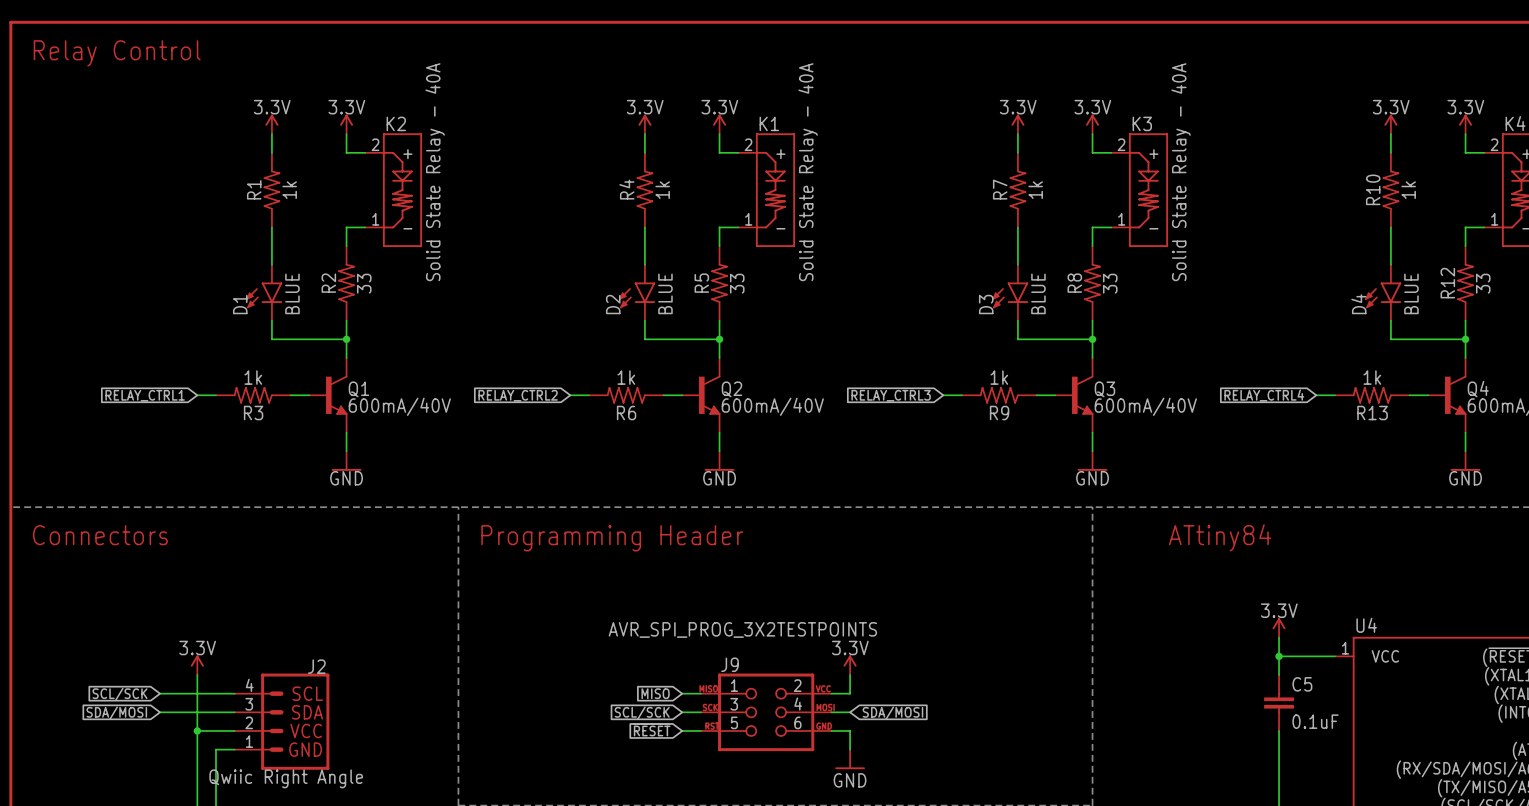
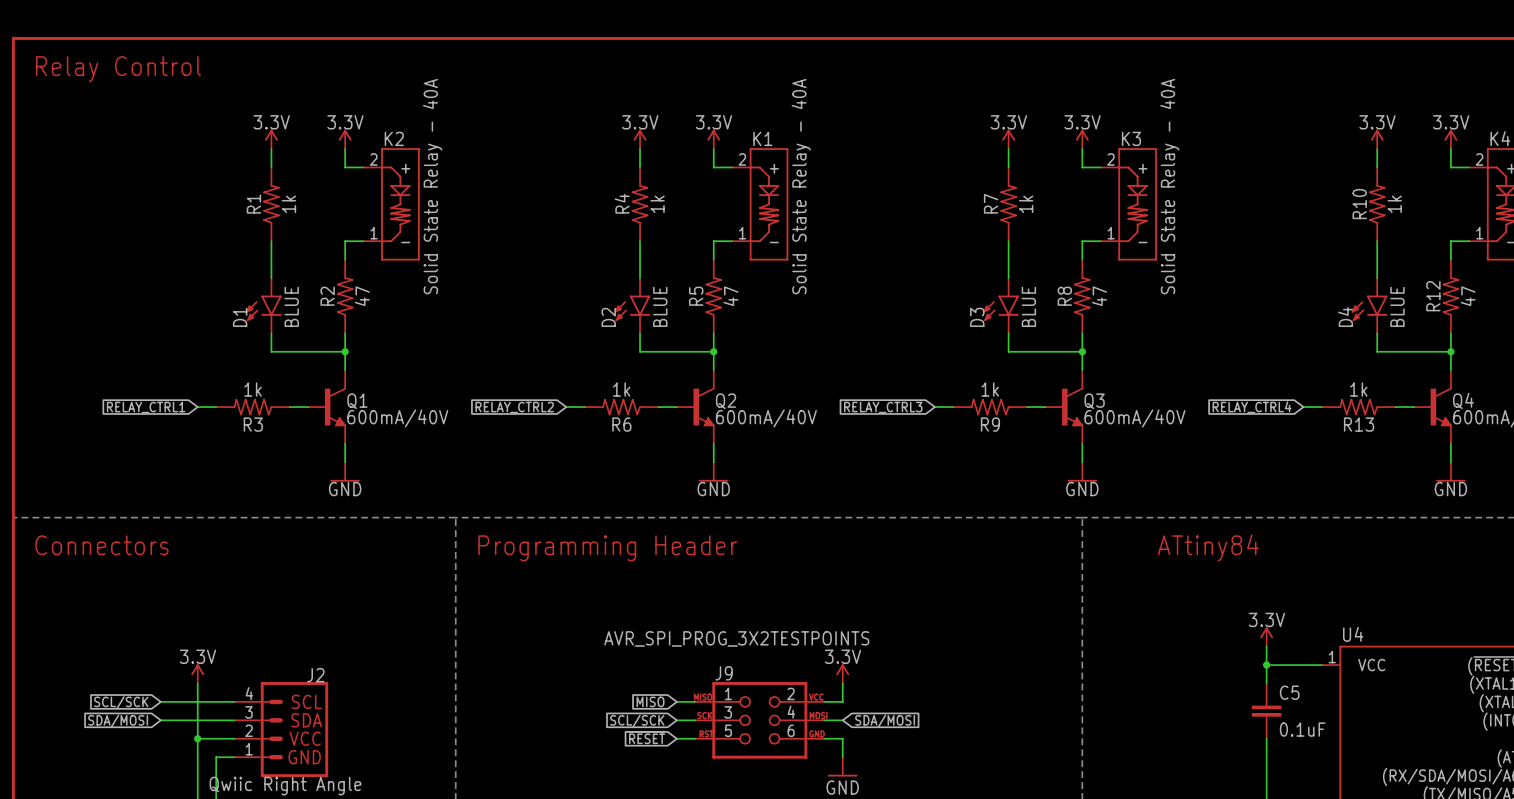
R2 value: 33 (364, 283) -> 47 (362, 296)
R5 value: 33 (737, 283) -> 47 (730, 296)
R8 value: 33 (1110, 283) -> 47 (1099, 296)
R12 value: 33 (1483, 283) -> 47 (1468, 296)

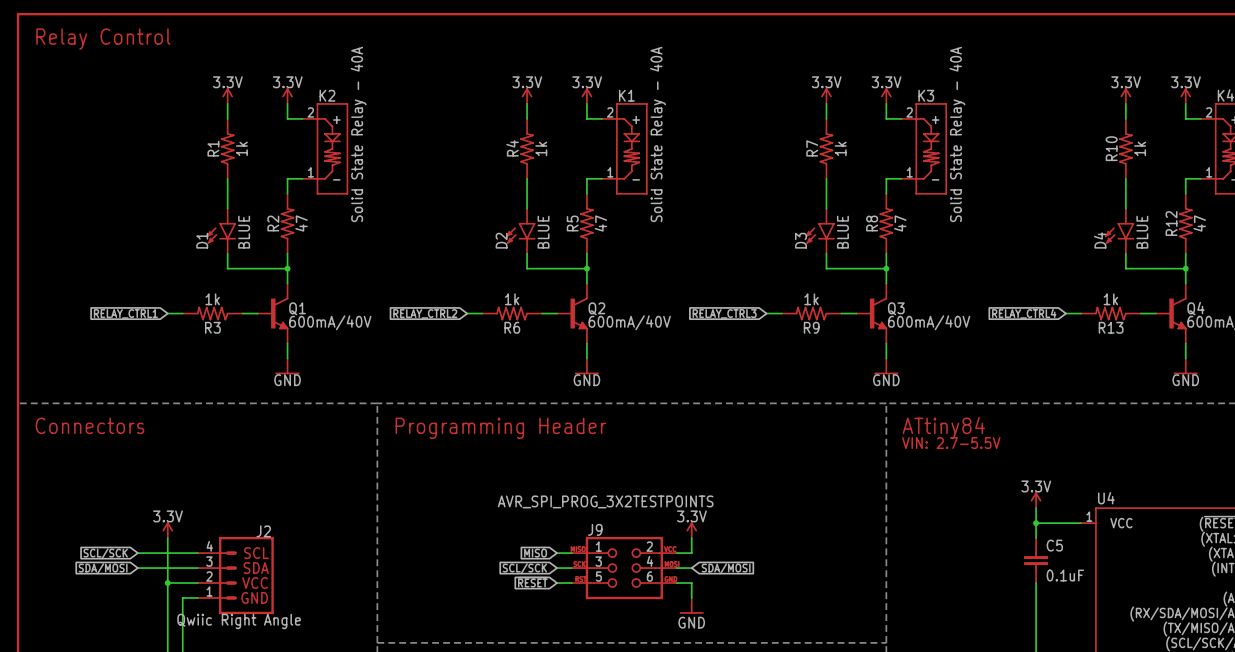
text position: ATtiny84 (1208, 547) -> ATtiny84 (943, 427)
text: none -> VIN: 2.7-5.5V (951, 443)

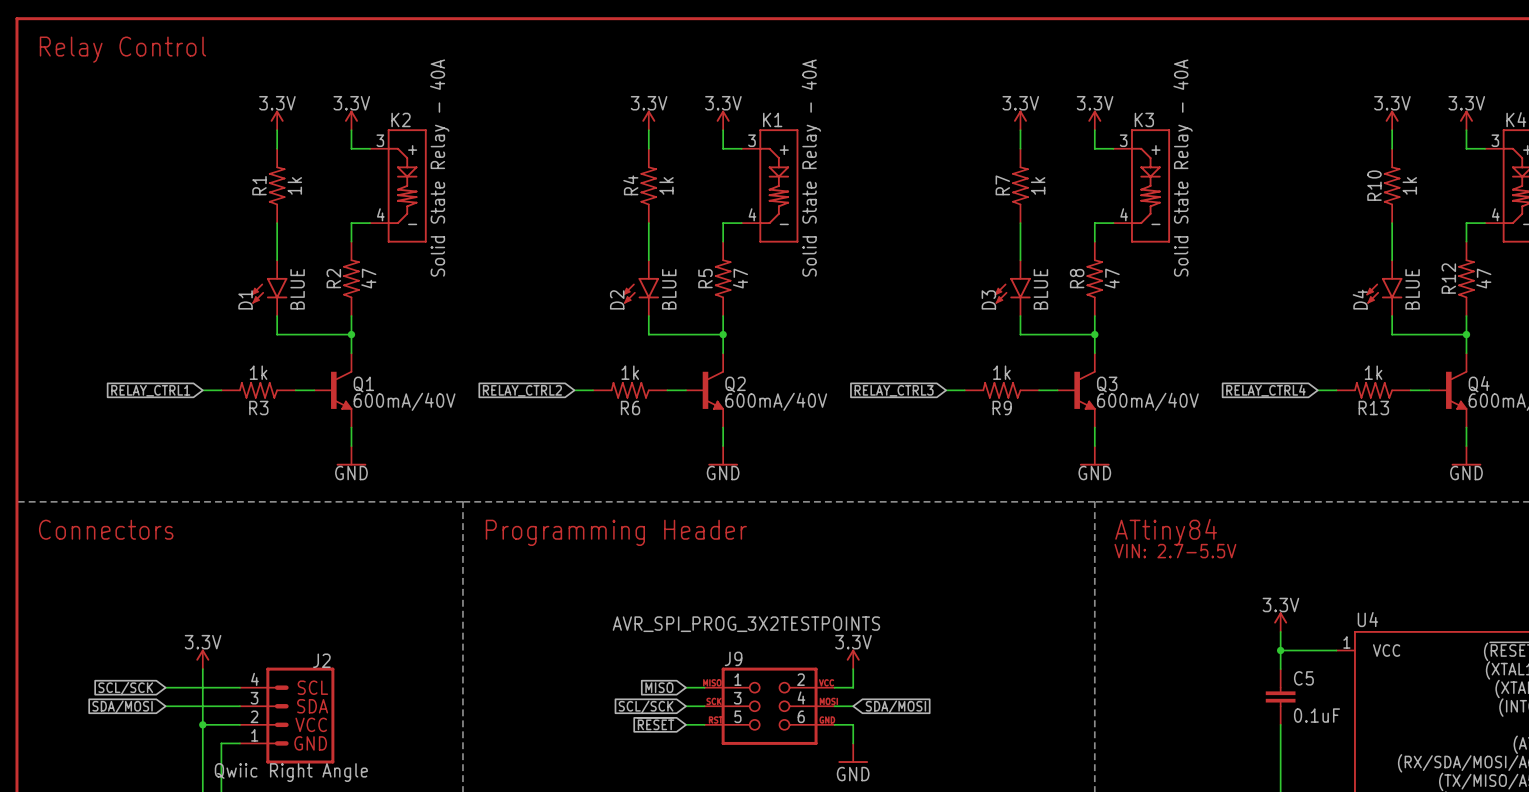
K2 pin number: 2 (310, 112) -> 3 (380, 140)
K1 pin number: 2 (610, 112) -> 3 (751, 140)
K3 pin number: 2 (909, 112) -> 3 (1123, 140)
K4 pin number: 2 (1209, 112) -> 3 (1495, 140)
K2 pin number: 1 (310, 172) -> 4 (380, 214)
K1 pin number: 1 (610, 172) -> 4 (752, 214)
K3 pin number: 1 (909, 172) -> 4 (1124, 214)
K4 pin number: 1 (1209, 172) -> 4 (1495, 214)

